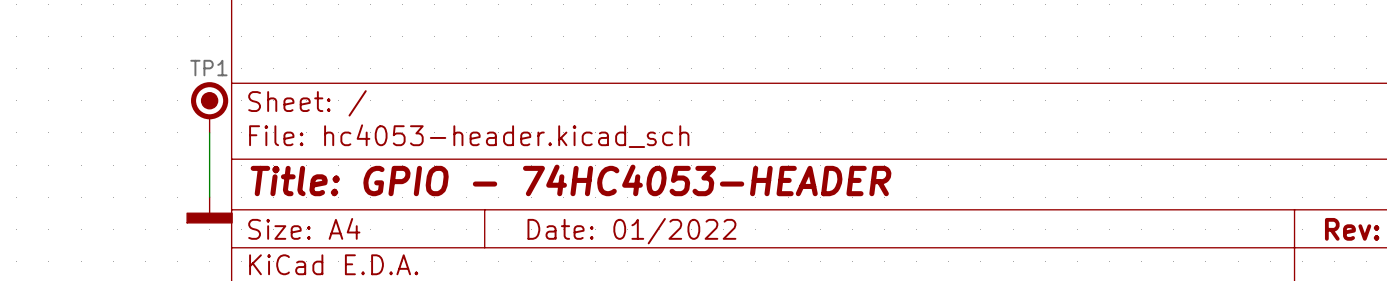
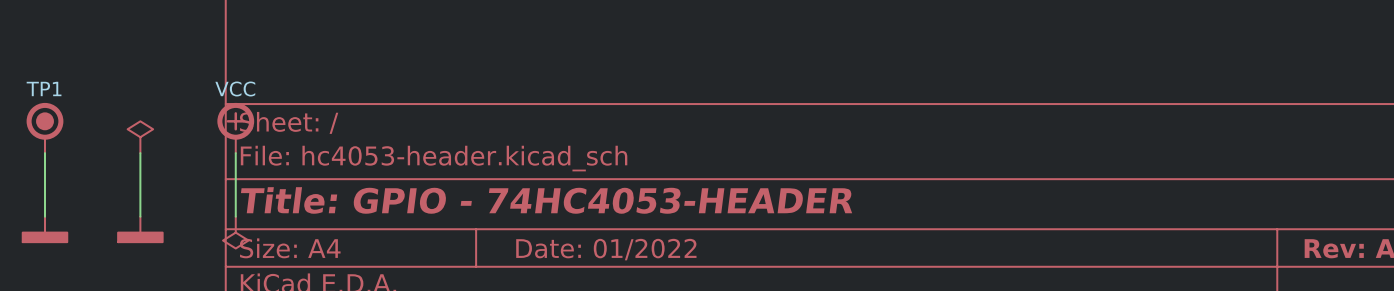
TP1 position: (209, 107) -> (44, 128)
power symbol: none -> (235, 128)
power symbol: none -> (140, 137)
wire: none -> (44, 153) (44, 216)
wire: none -> (140, 153) (140, 216)
wire: (209, 132) (209, 197) -> (235, 153) (235, 216)
power symbol: none -> (44, 229)
power symbol position: (209, 210) -> (140, 229)
power symbol: none -> (235, 232)

